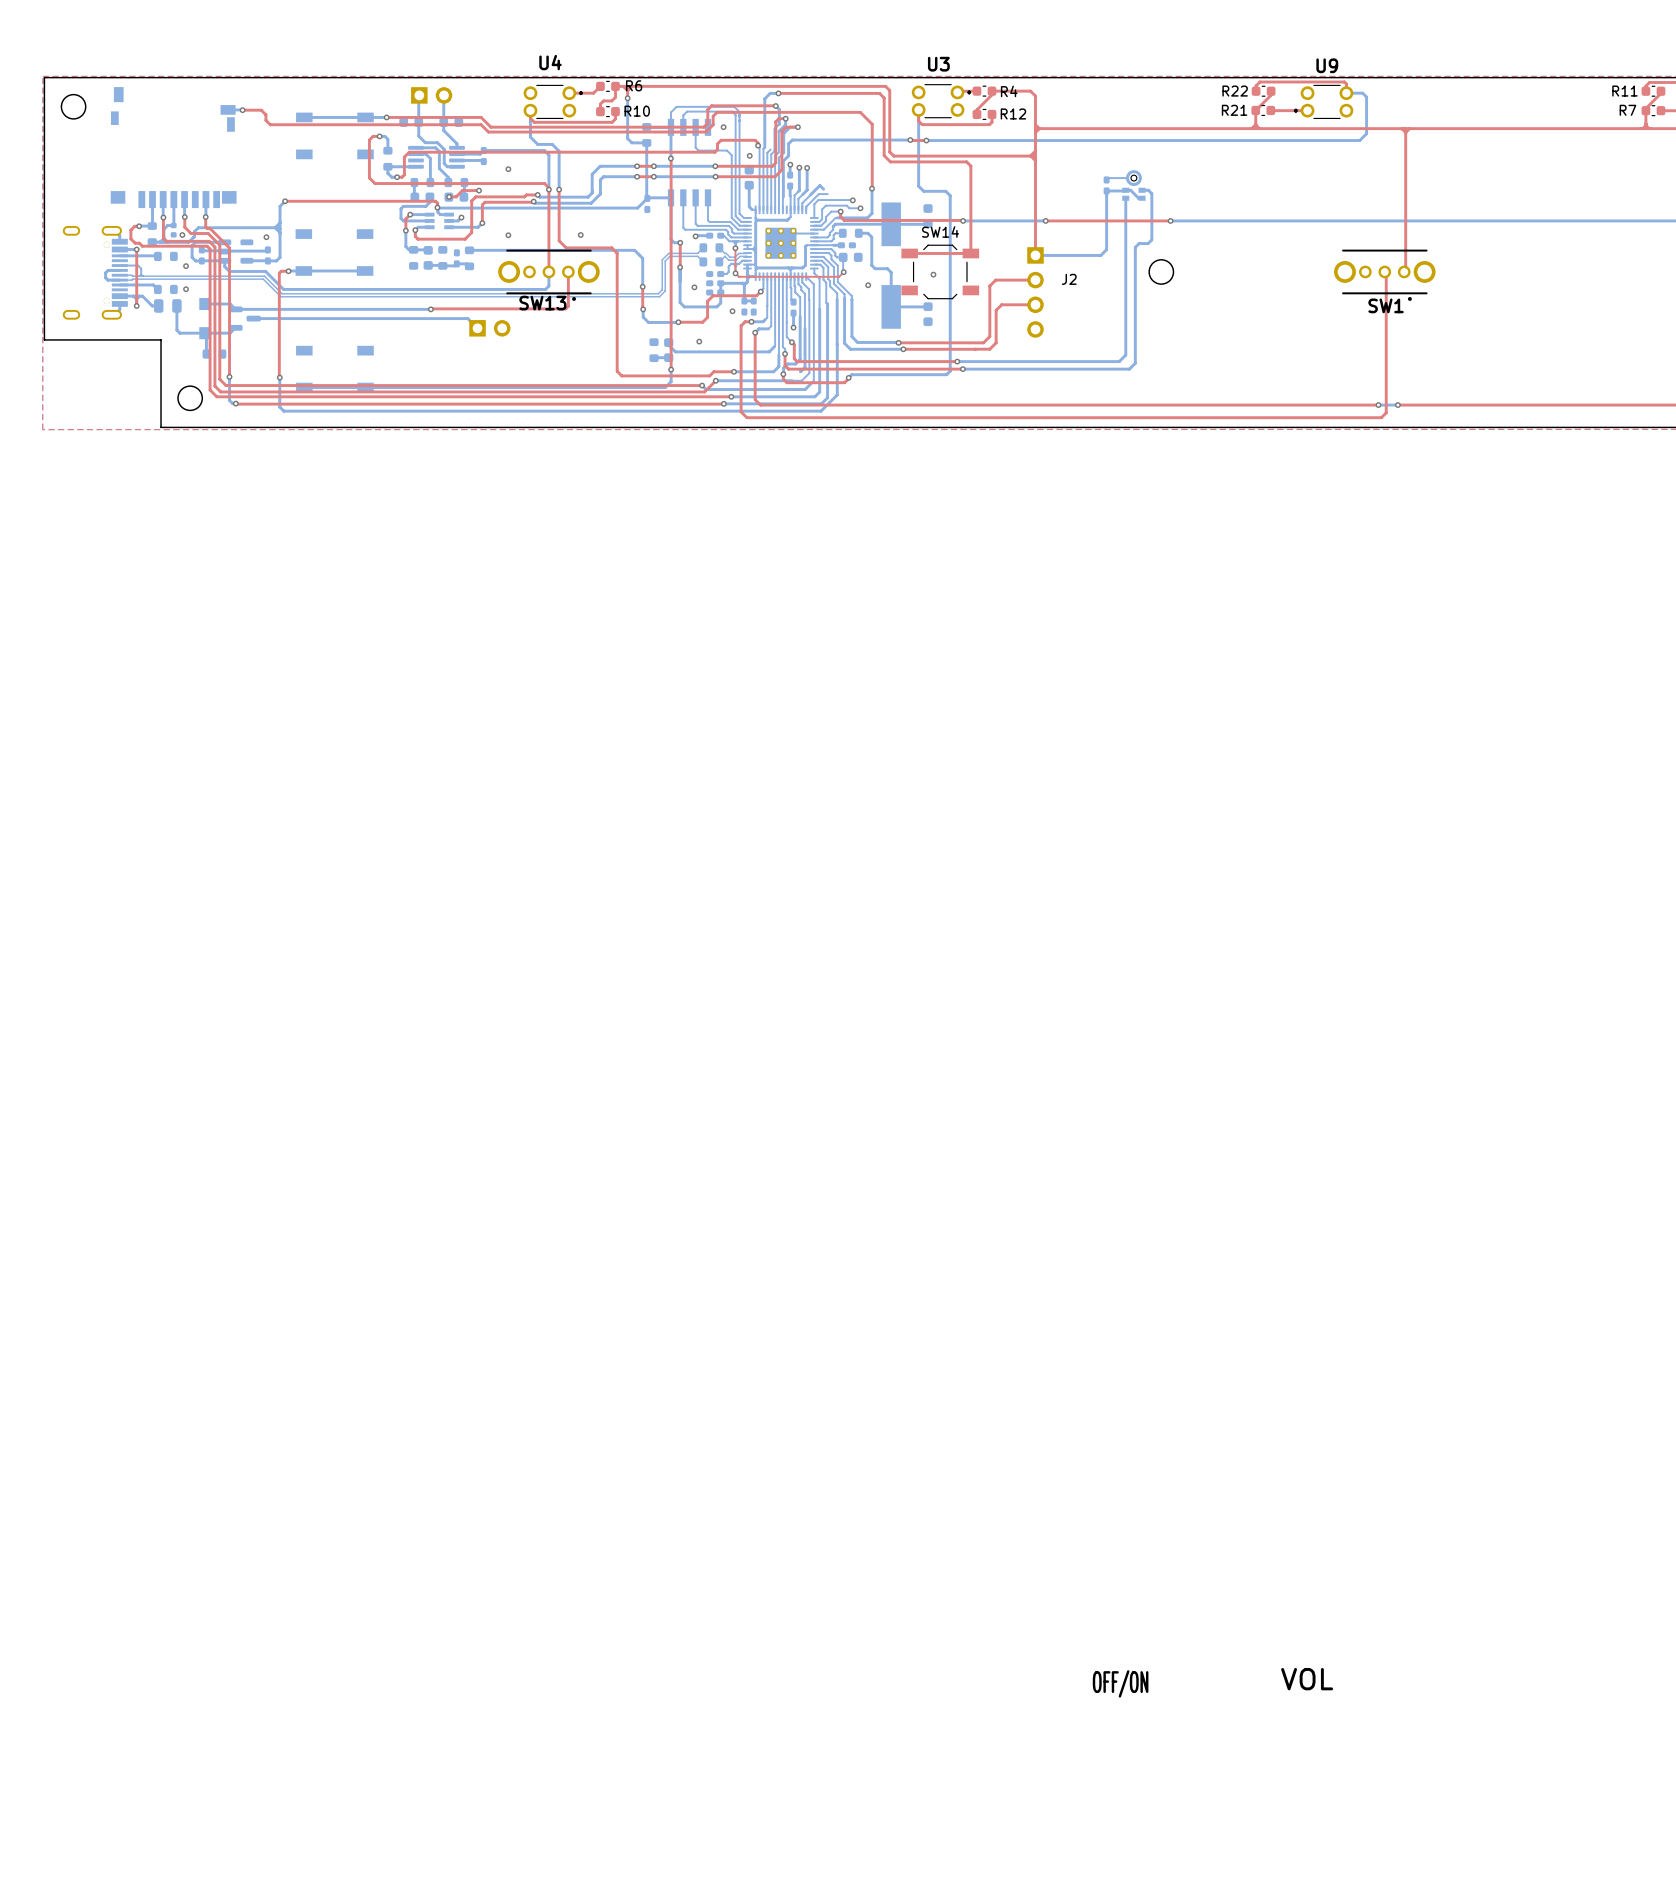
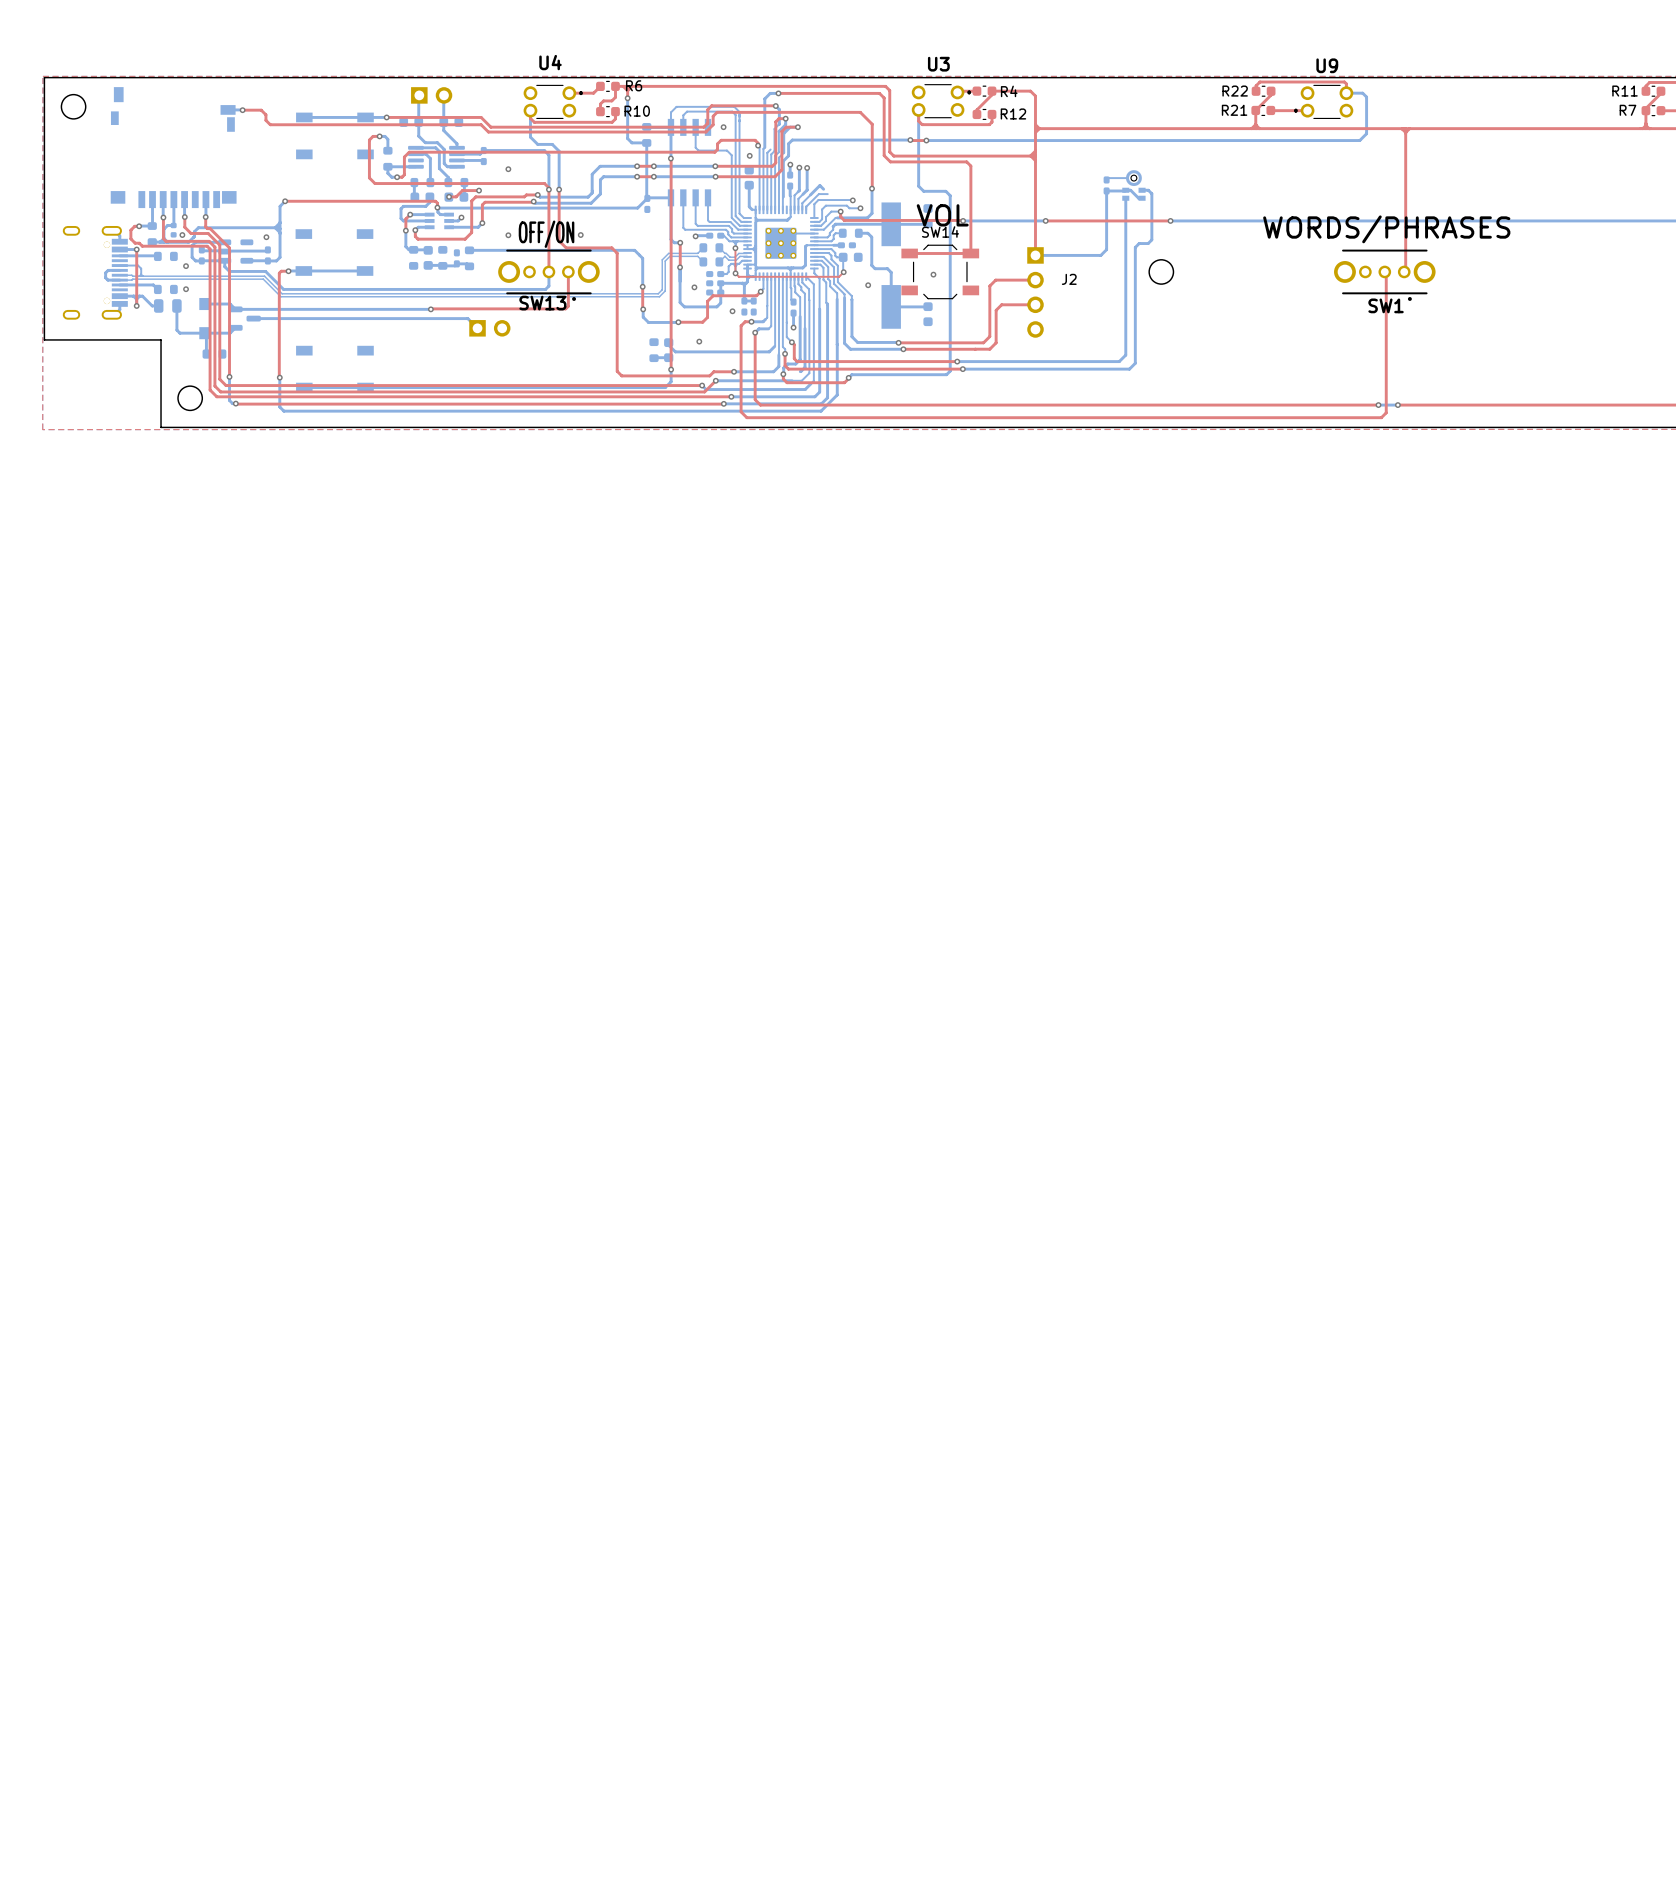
text: none -> VOL (942, 215)
text: none -> WORDS/PHRASES (1386, 229)
text: none -> OFF/ON (546, 234)
text: VOL (1307, 1679) -> none
text: OFF/ON (1120, 1683) -> none

